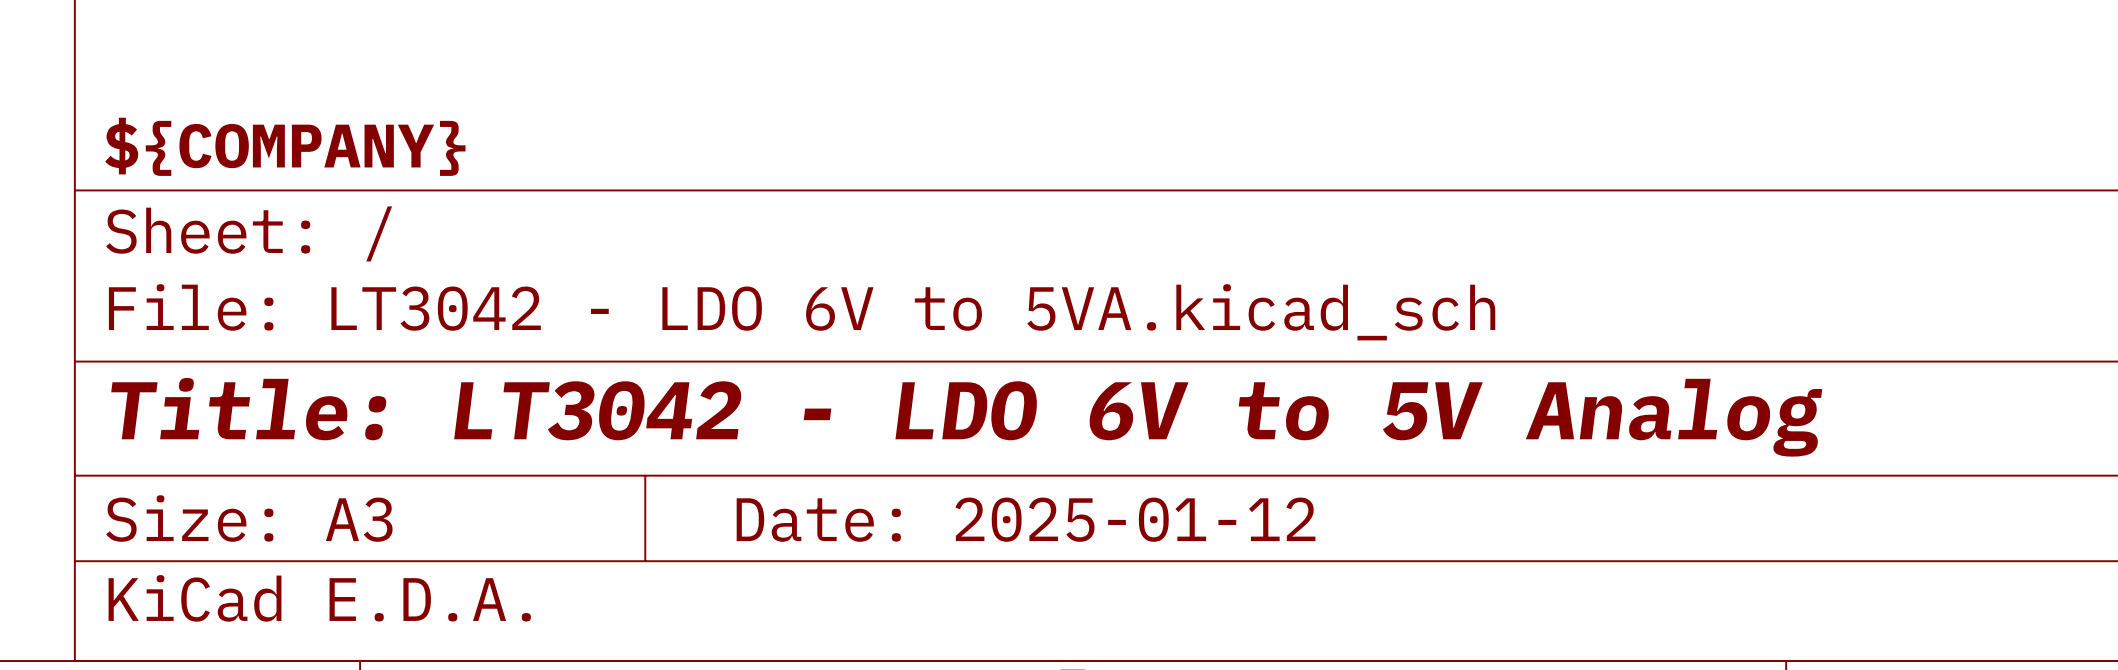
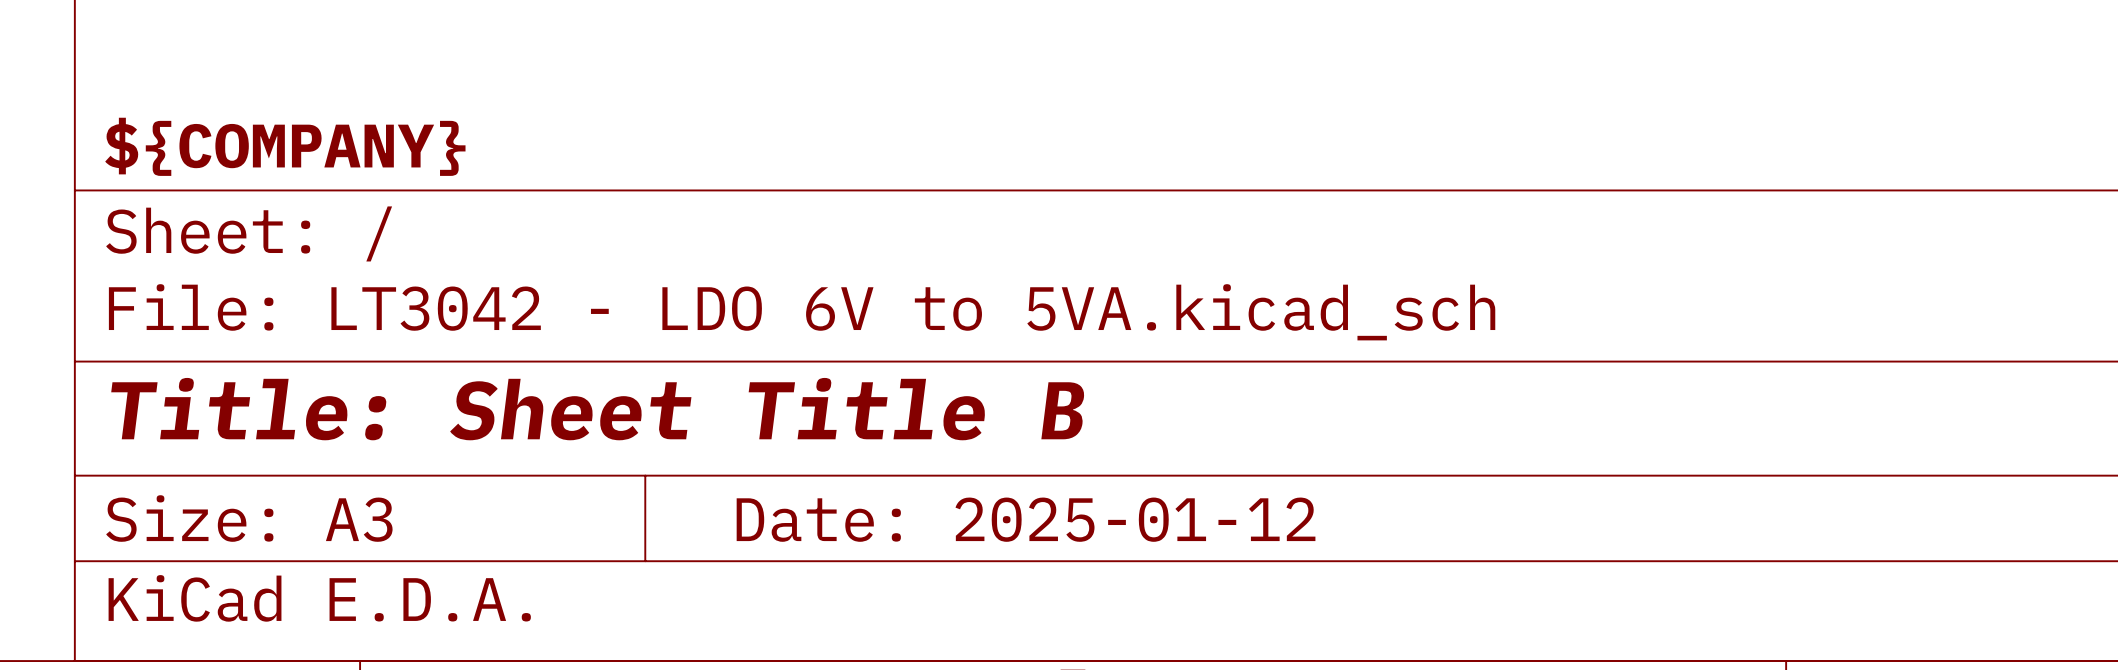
title block: Title: LT3042 - LDO 6V to 5V Analog (966, 417) -> Title: Sheet Title B (598, 409)

